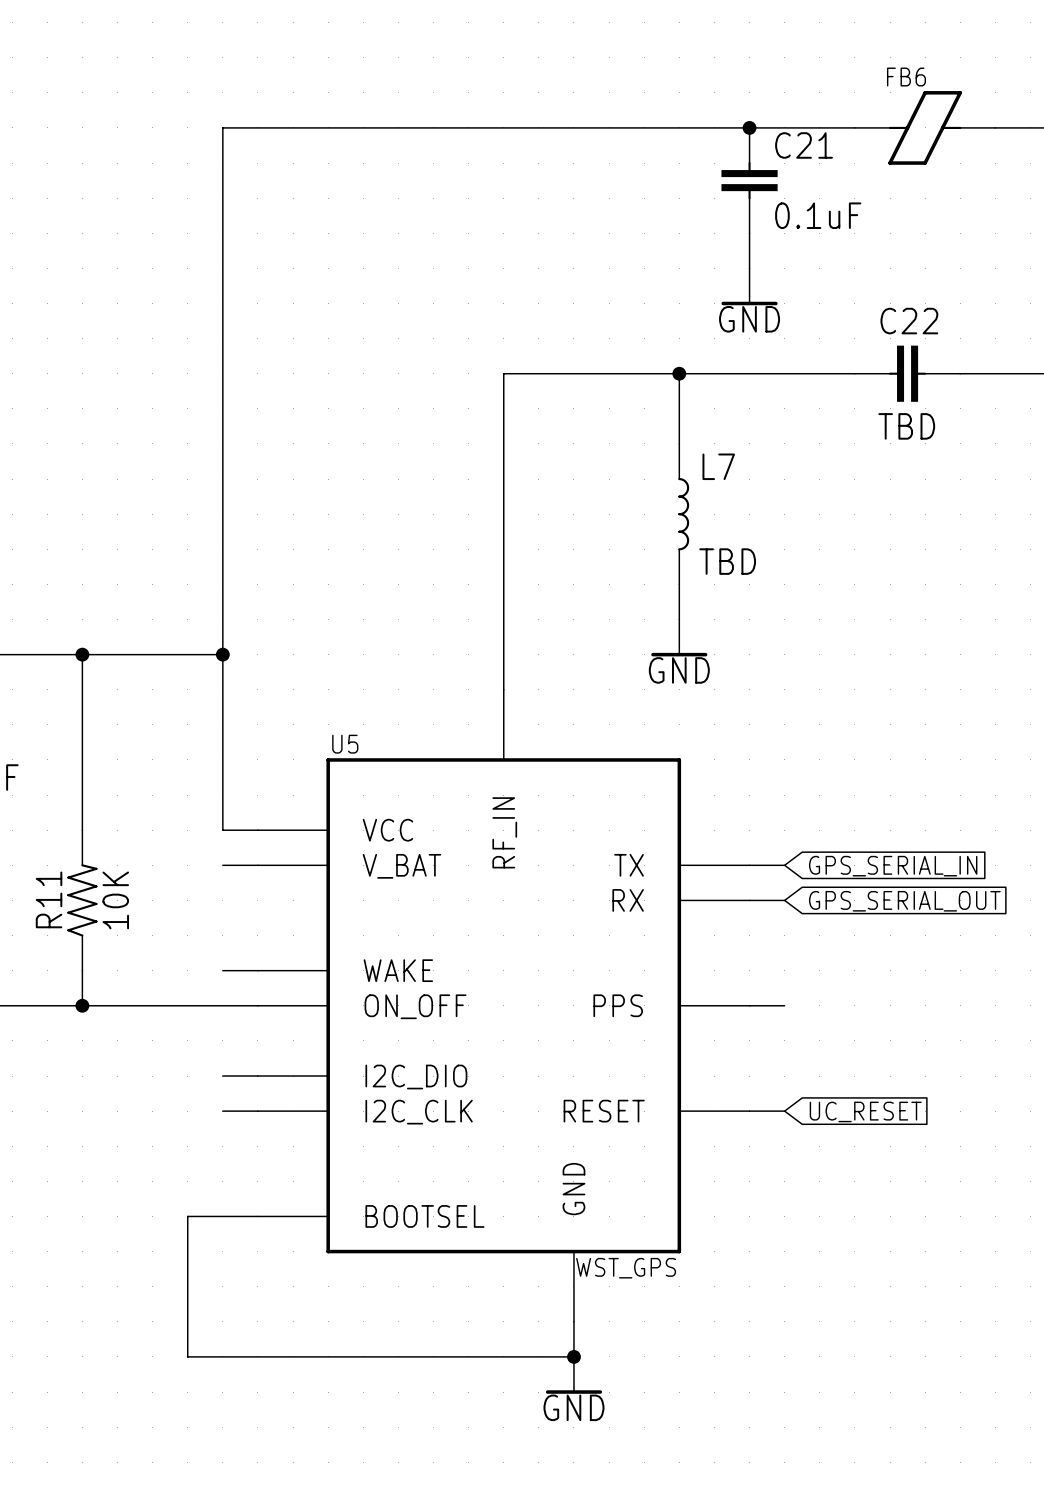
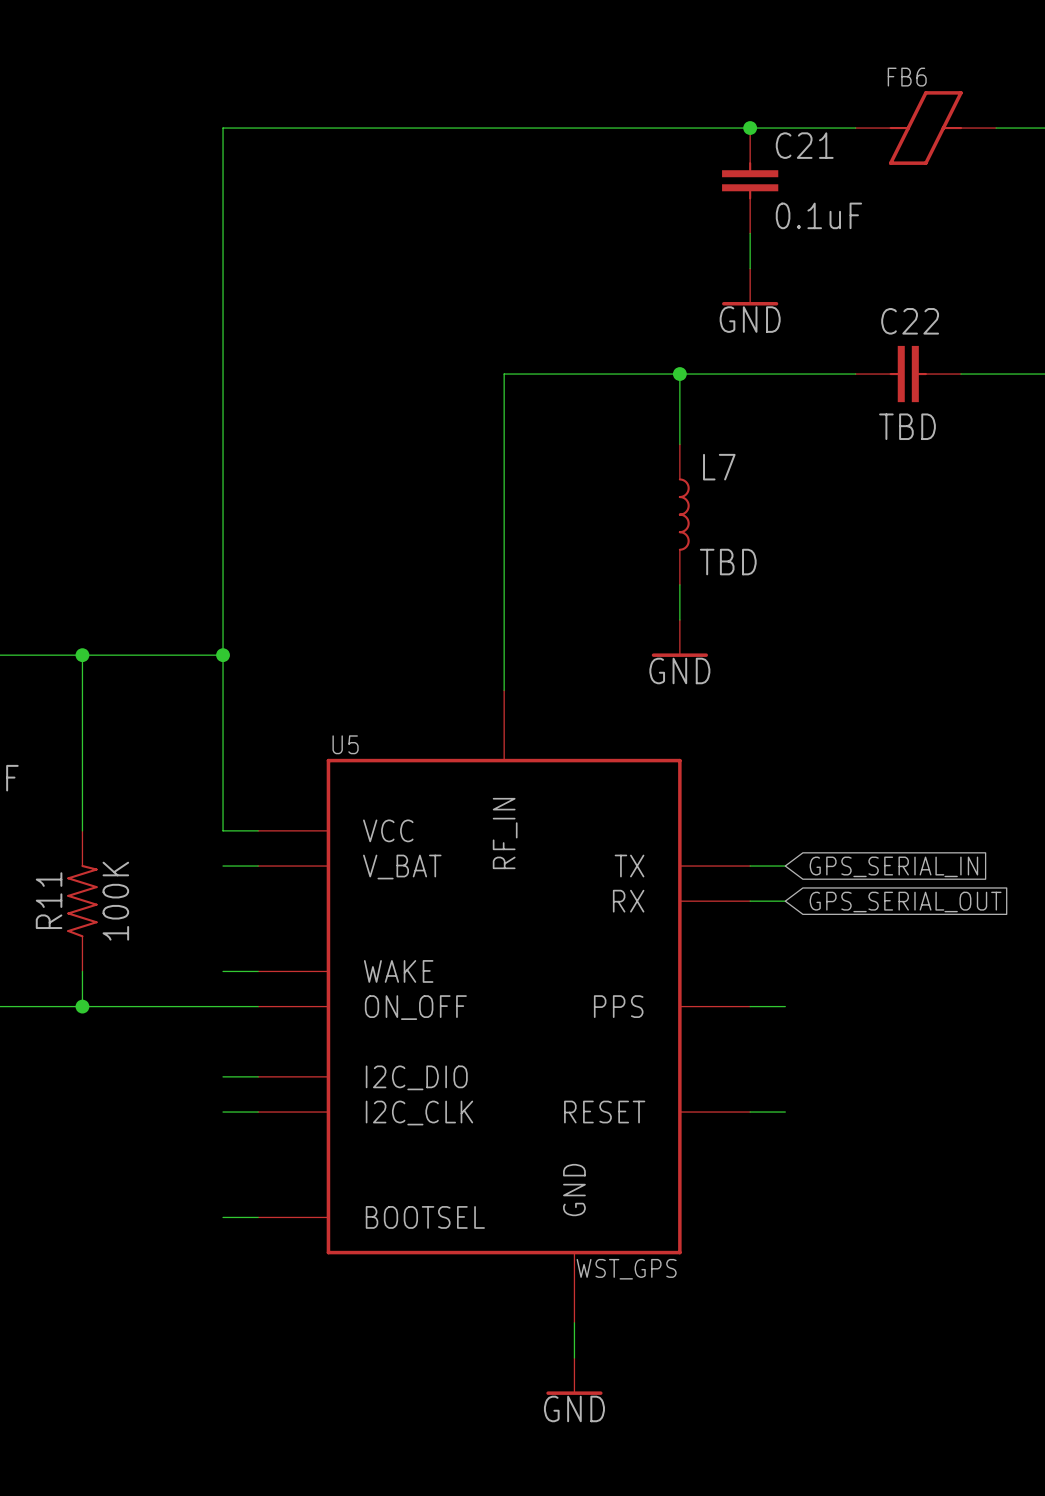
R11 value: 10K (115, 900) -> 100K (115, 901)
global label: UC_RESET (865, 1111) -> none
wire: (222, 1216) (187, 1216) (187, 1356) (573, 1356) -> none
junction: (573, 1356) -> none

